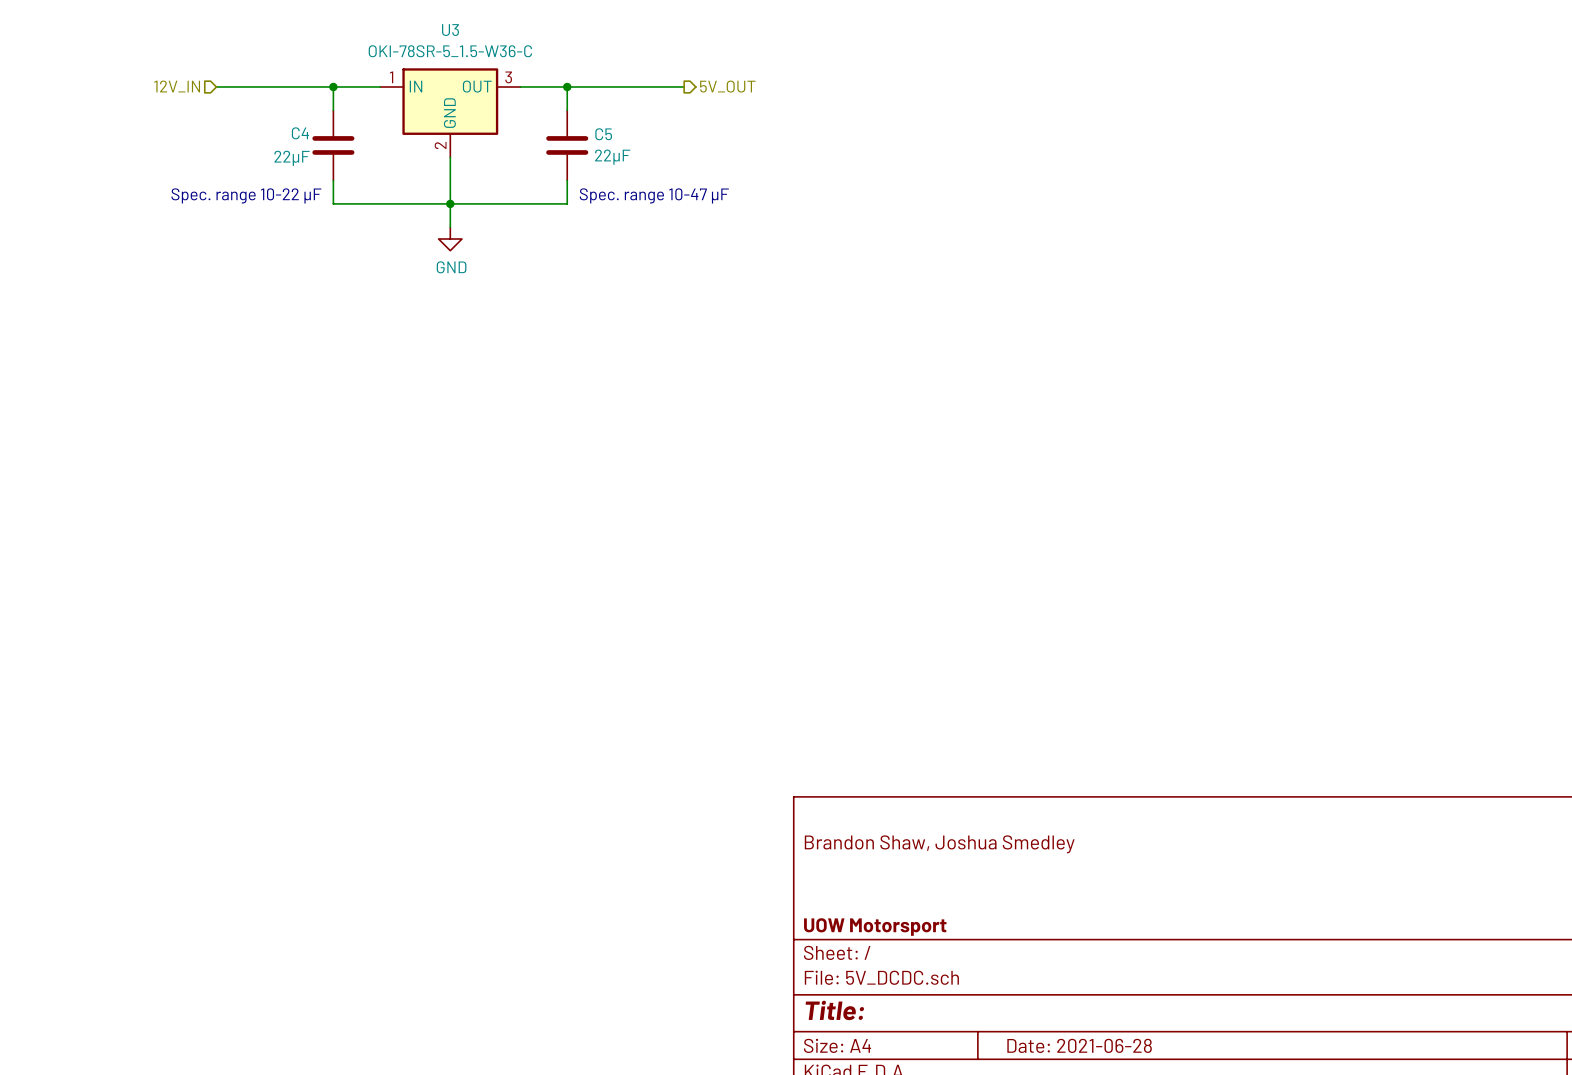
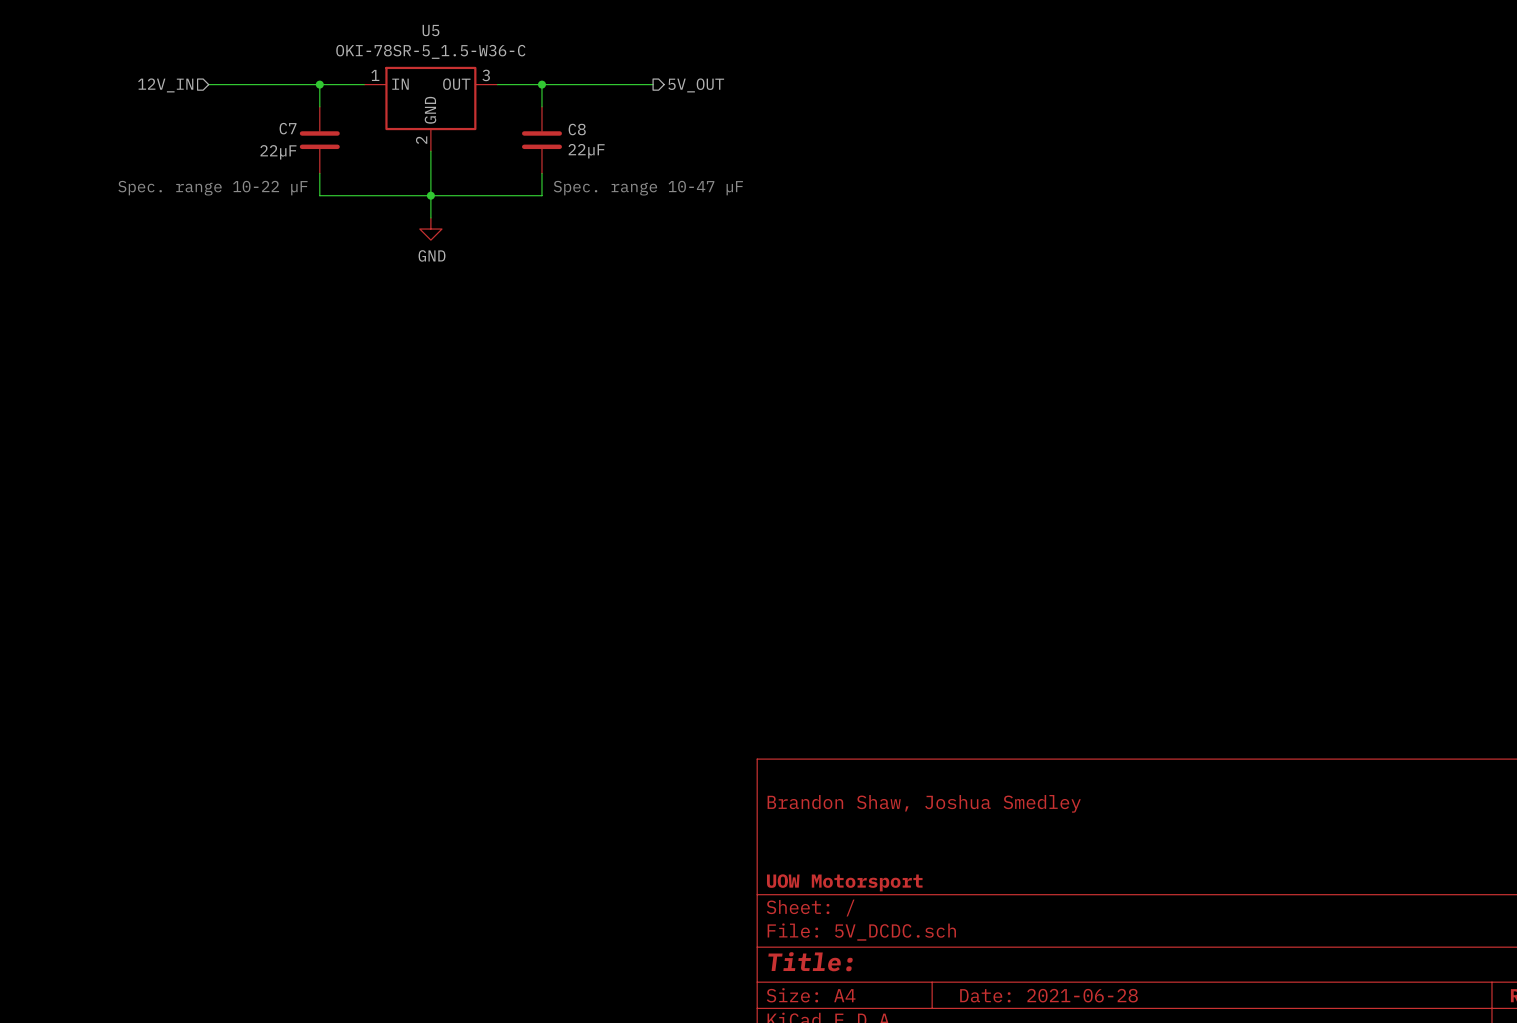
U3 name: U3 (450, 30) -> U5 (430, 30)
C4 name: C4 (300, 133) -> C7 (288, 128)
C5 name: C5 (603, 134) -> C8 (577, 129)

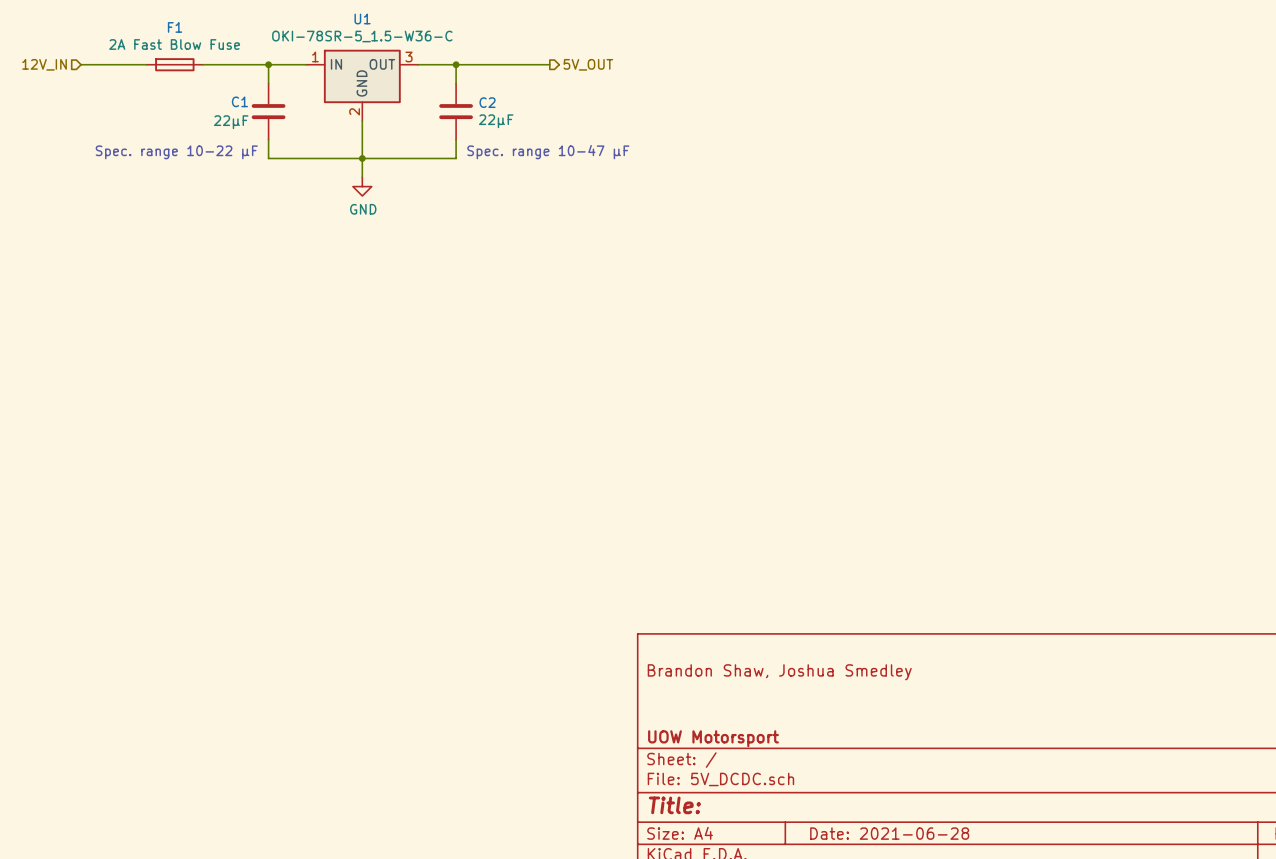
U5 name: U5 (430, 30) -> U1 (362, 19)
wire: none -> (81, 64) (146, 64)
F1: none -> 2A Fast Blow Fuse (174, 64)
hierarchical label position: 12V_IN (165, 85) -> 12V_IN (44, 64)
C7 name: C7 (288, 128) -> C1 (239, 101)
C8 name: C8 (577, 129) -> C2 (487, 102)

